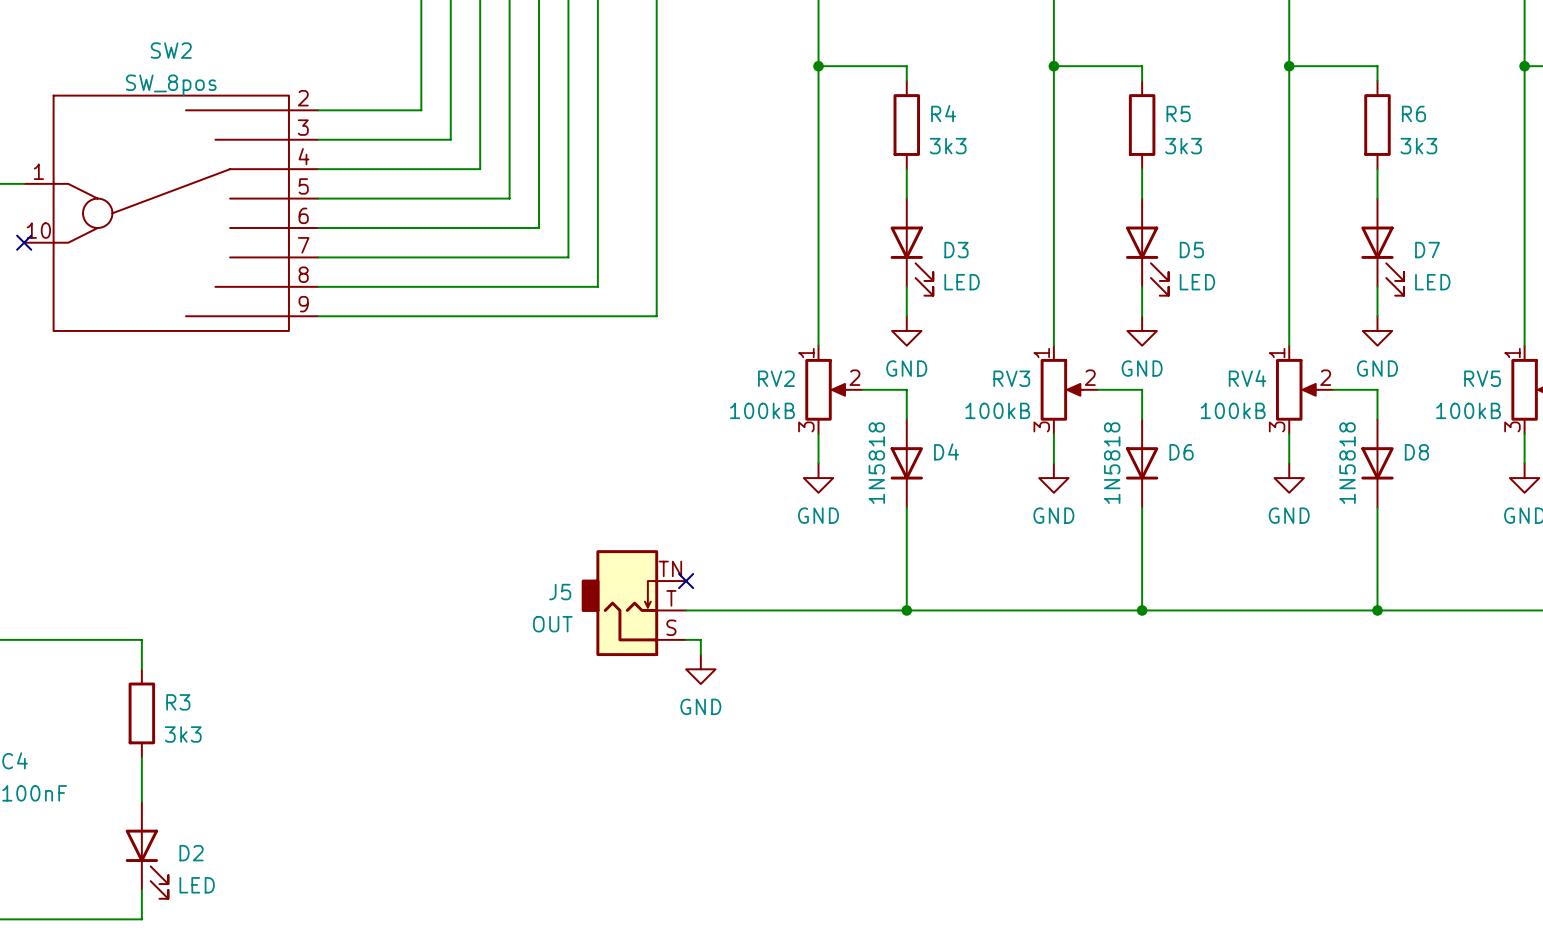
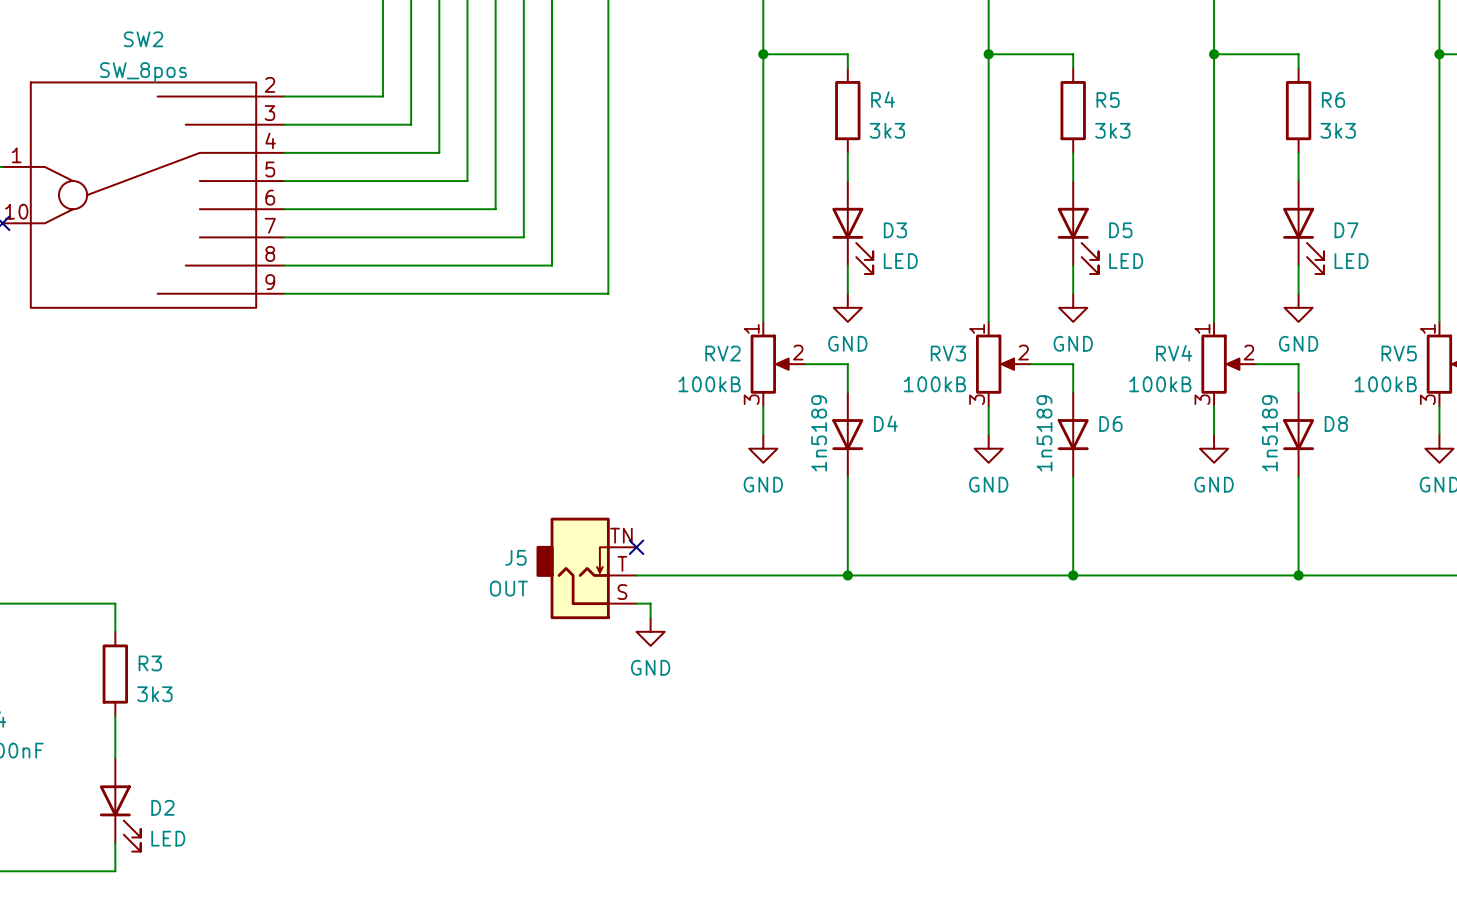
D4 value: 1N5818 (876, 463) -> 1n5189 (819, 433)
D6 value: 1N5818 (1112, 463) -> 1n5189 (1044, 433)
D8 value: 1N5818 (1347, 463) -> 1n5189 (1269, 433)

